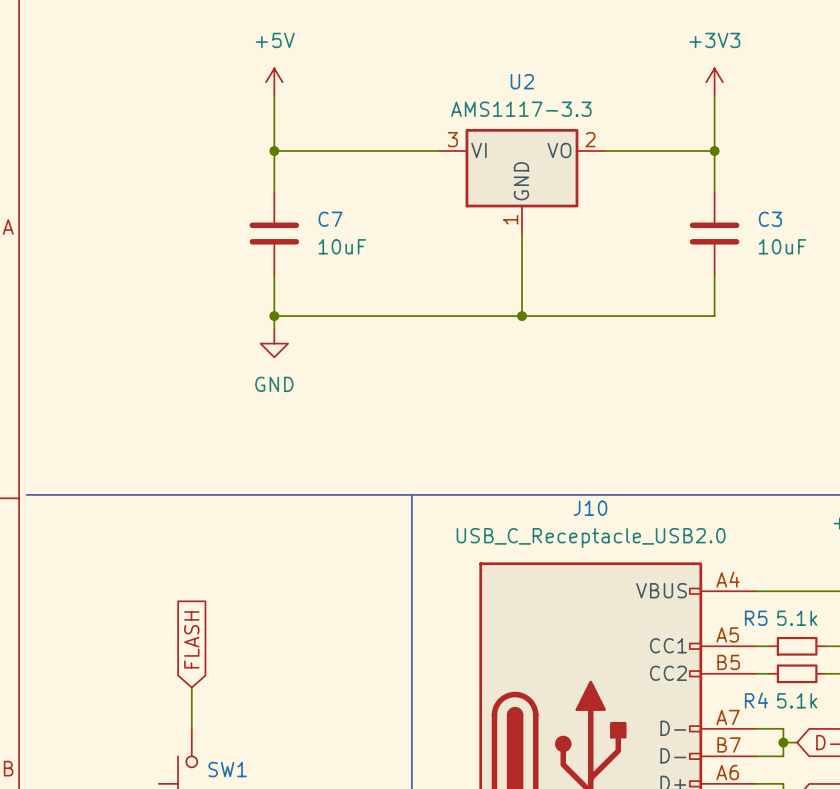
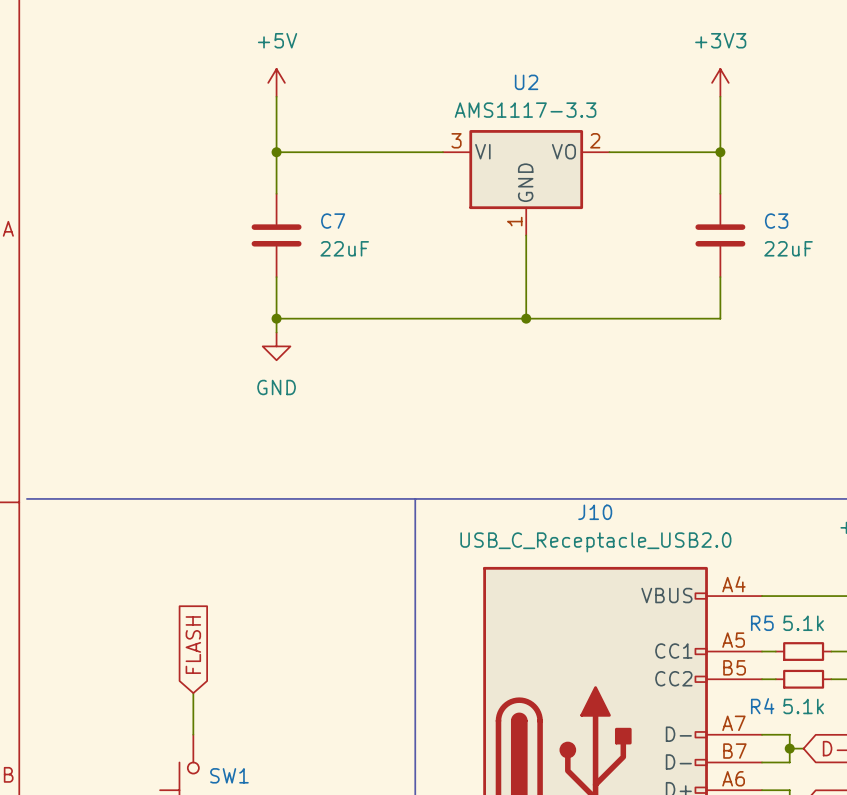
C7 value: 10uF (342, 246) -> 22uF (344, 248)
C3 value: 10uF (782, 246) -> 22uF (788, 248)

